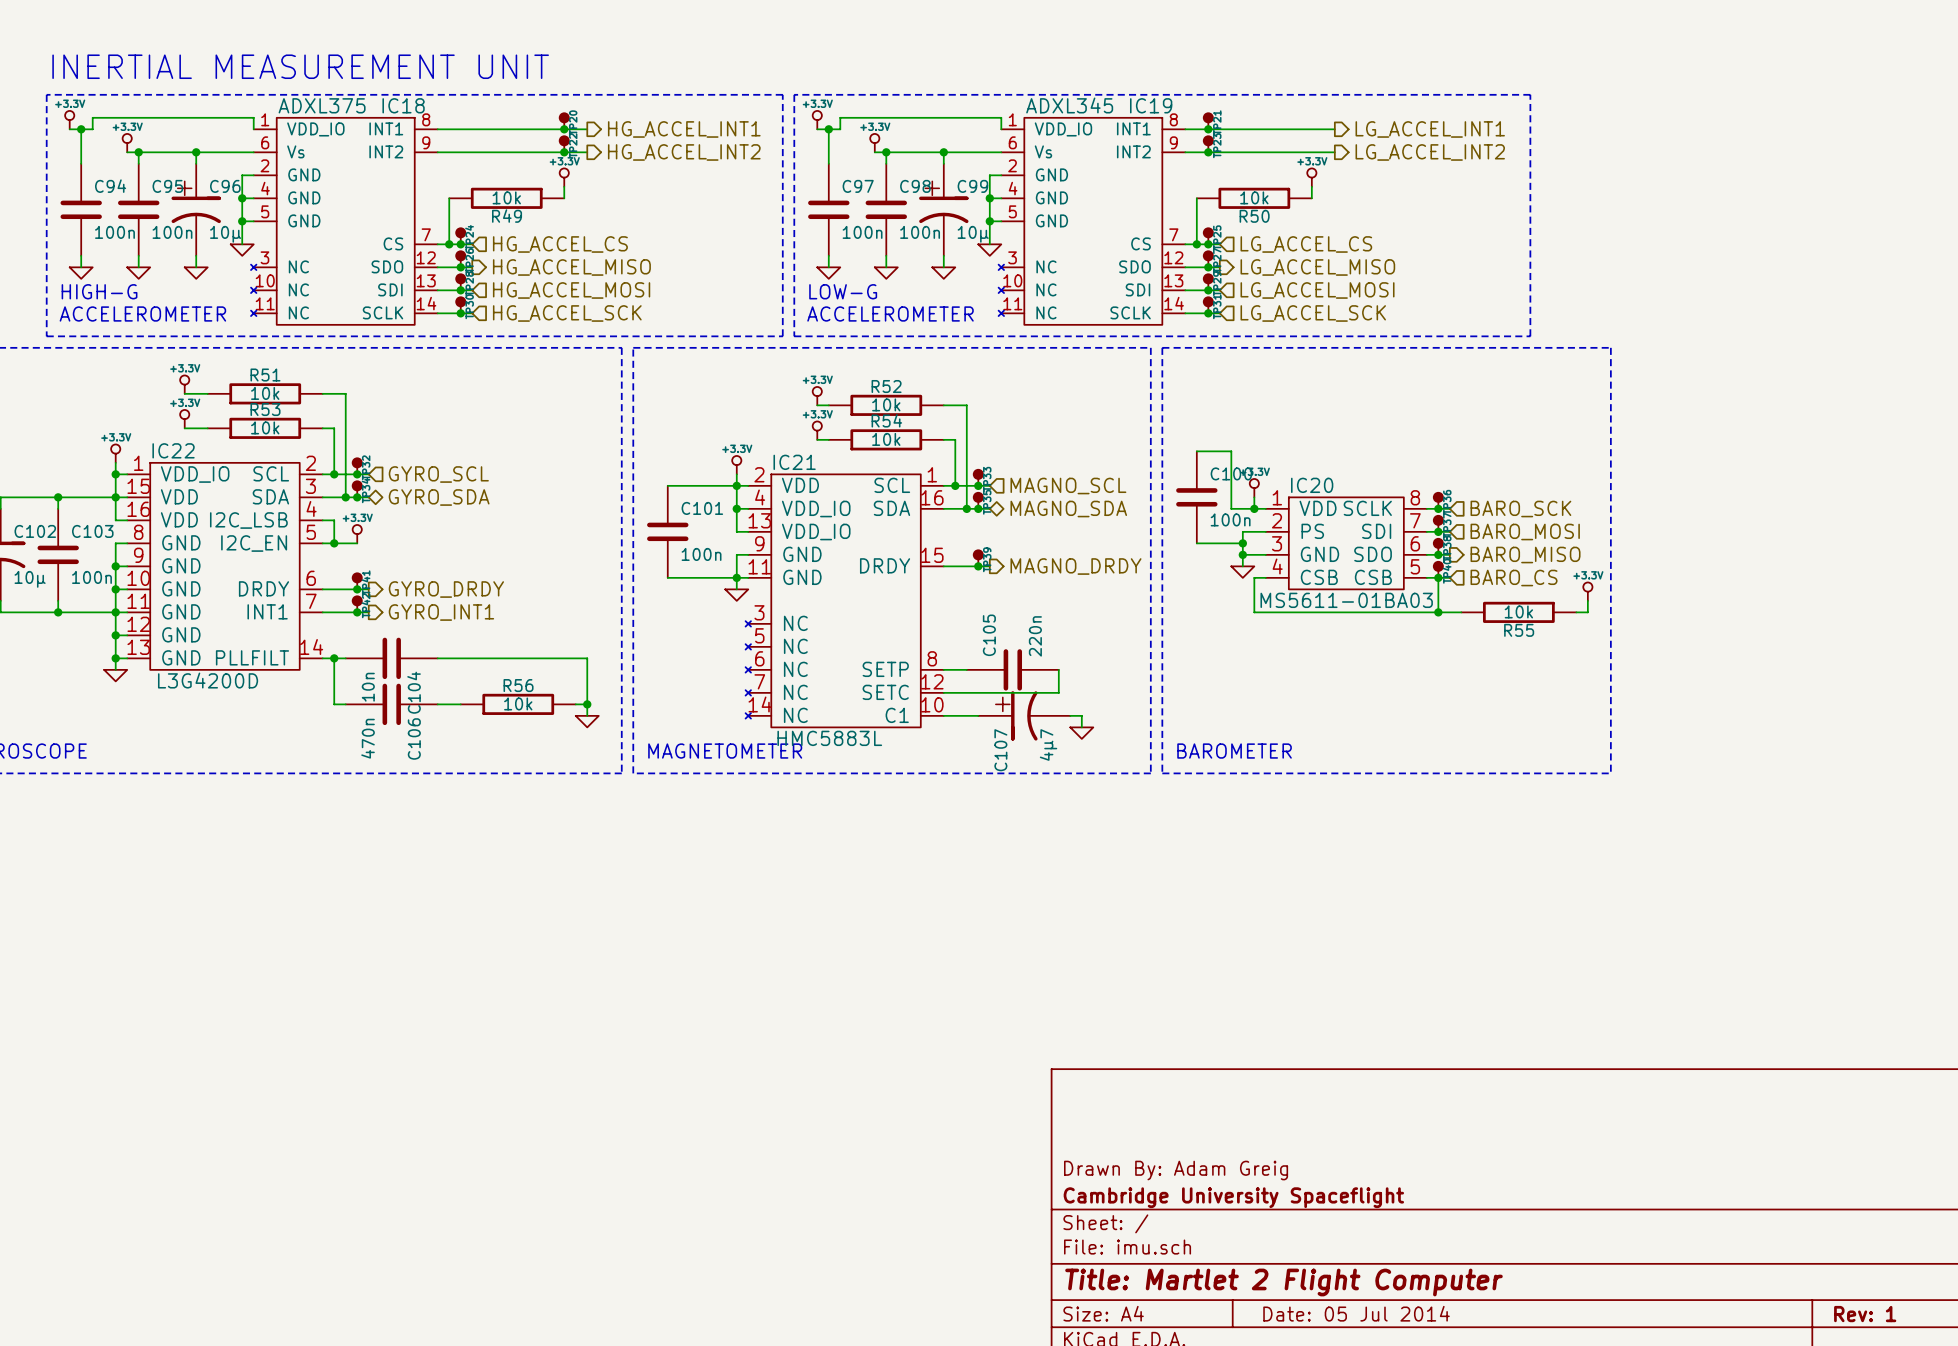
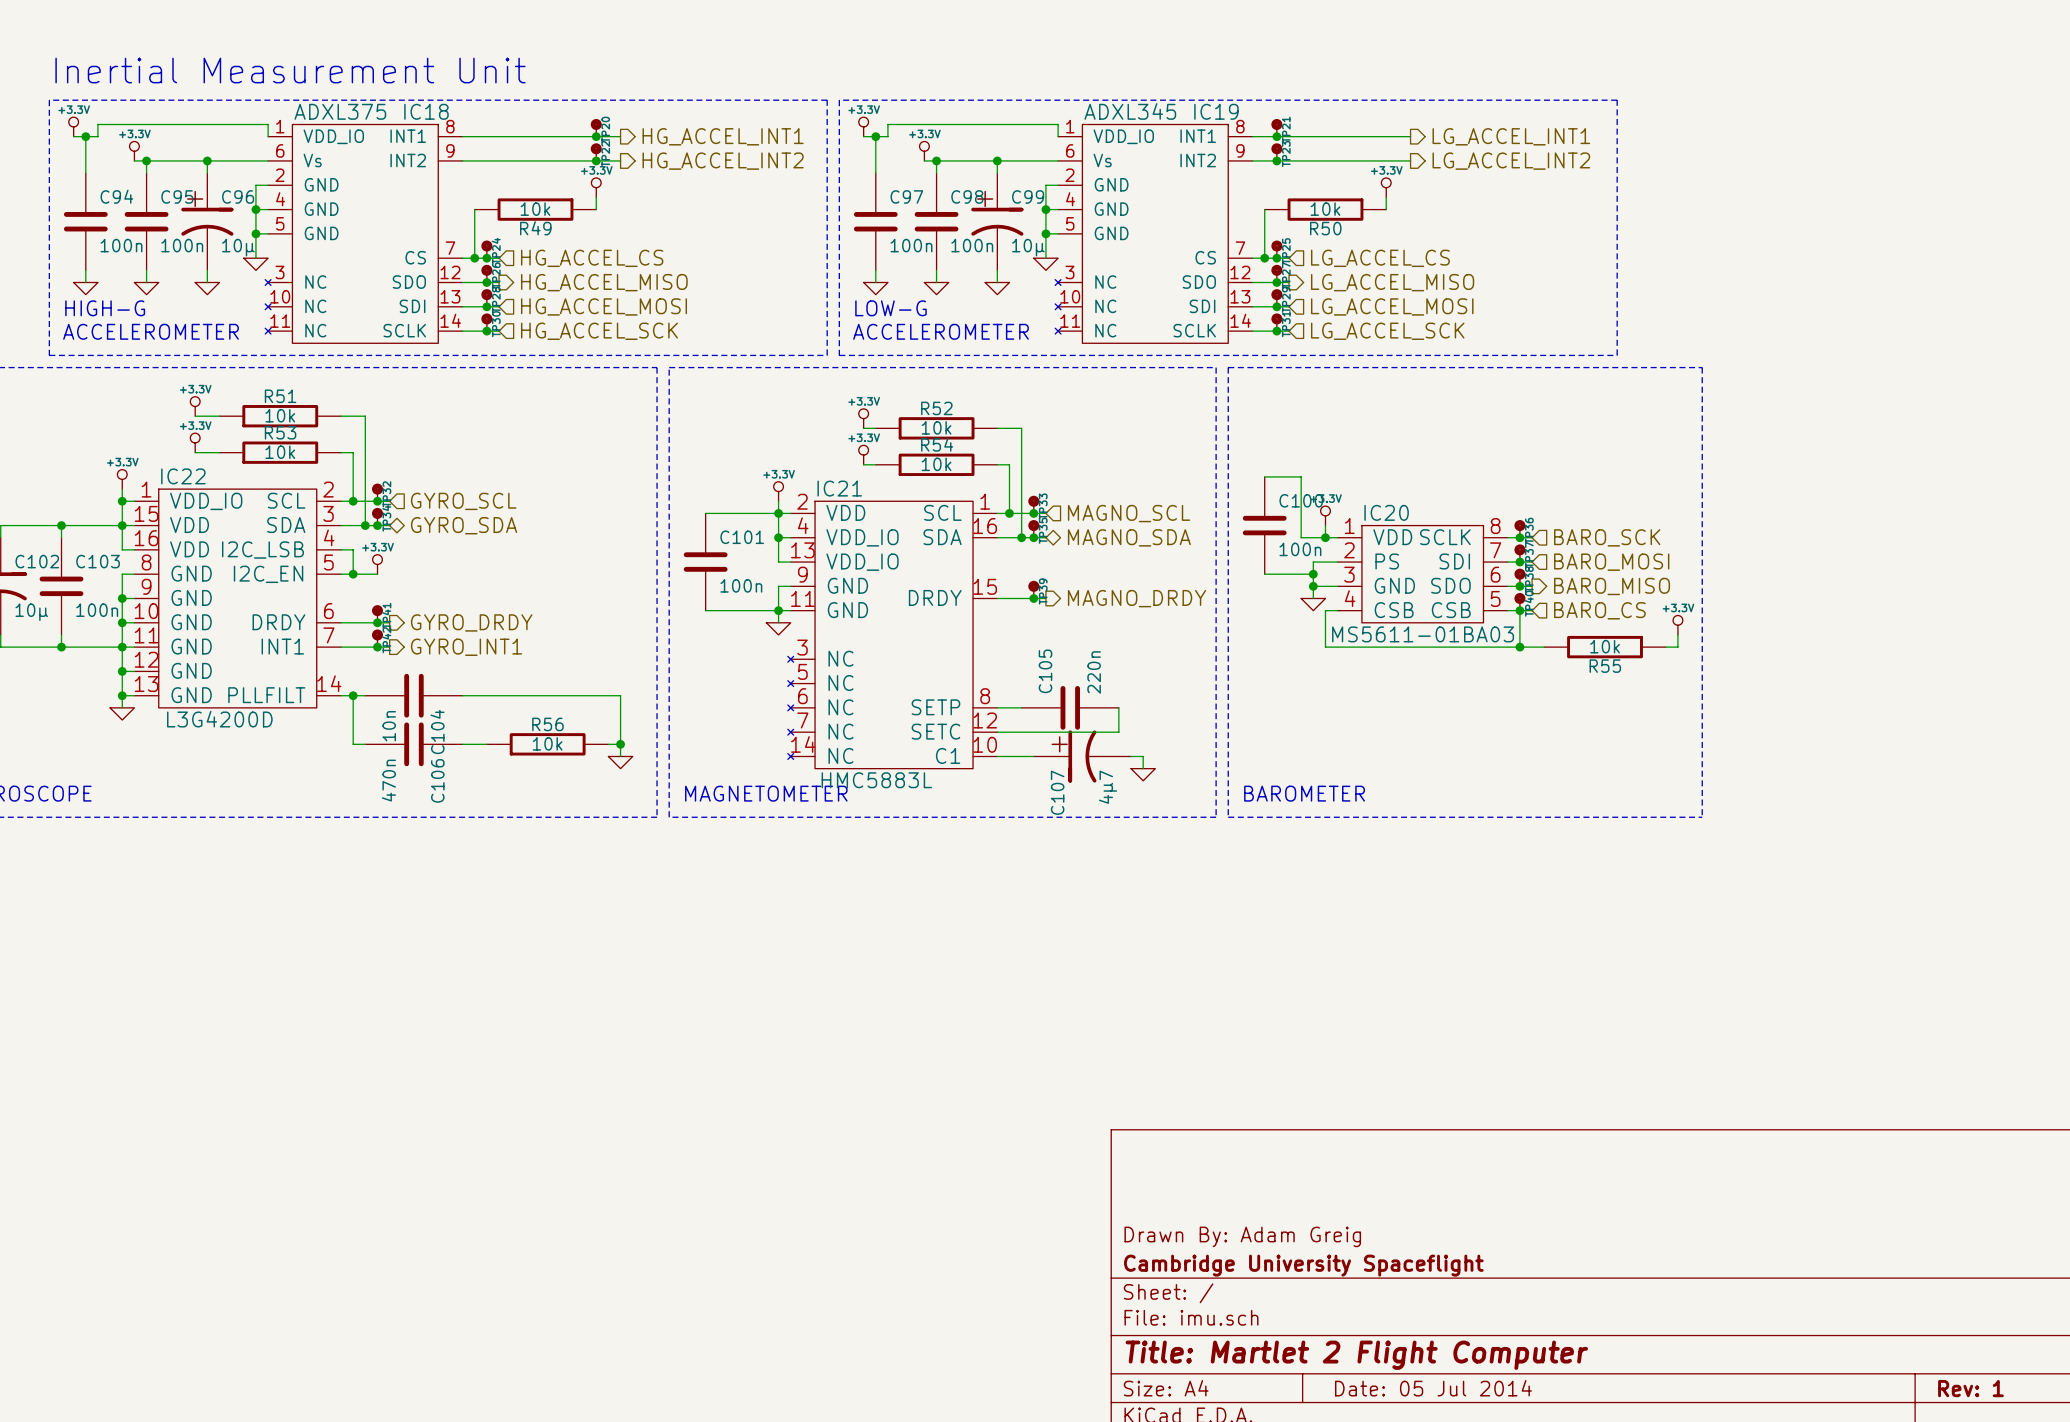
text: INERTIAL MEASUREMENT UNIT (300, 66) -> Inertial Measurement Unit (290, 70)

